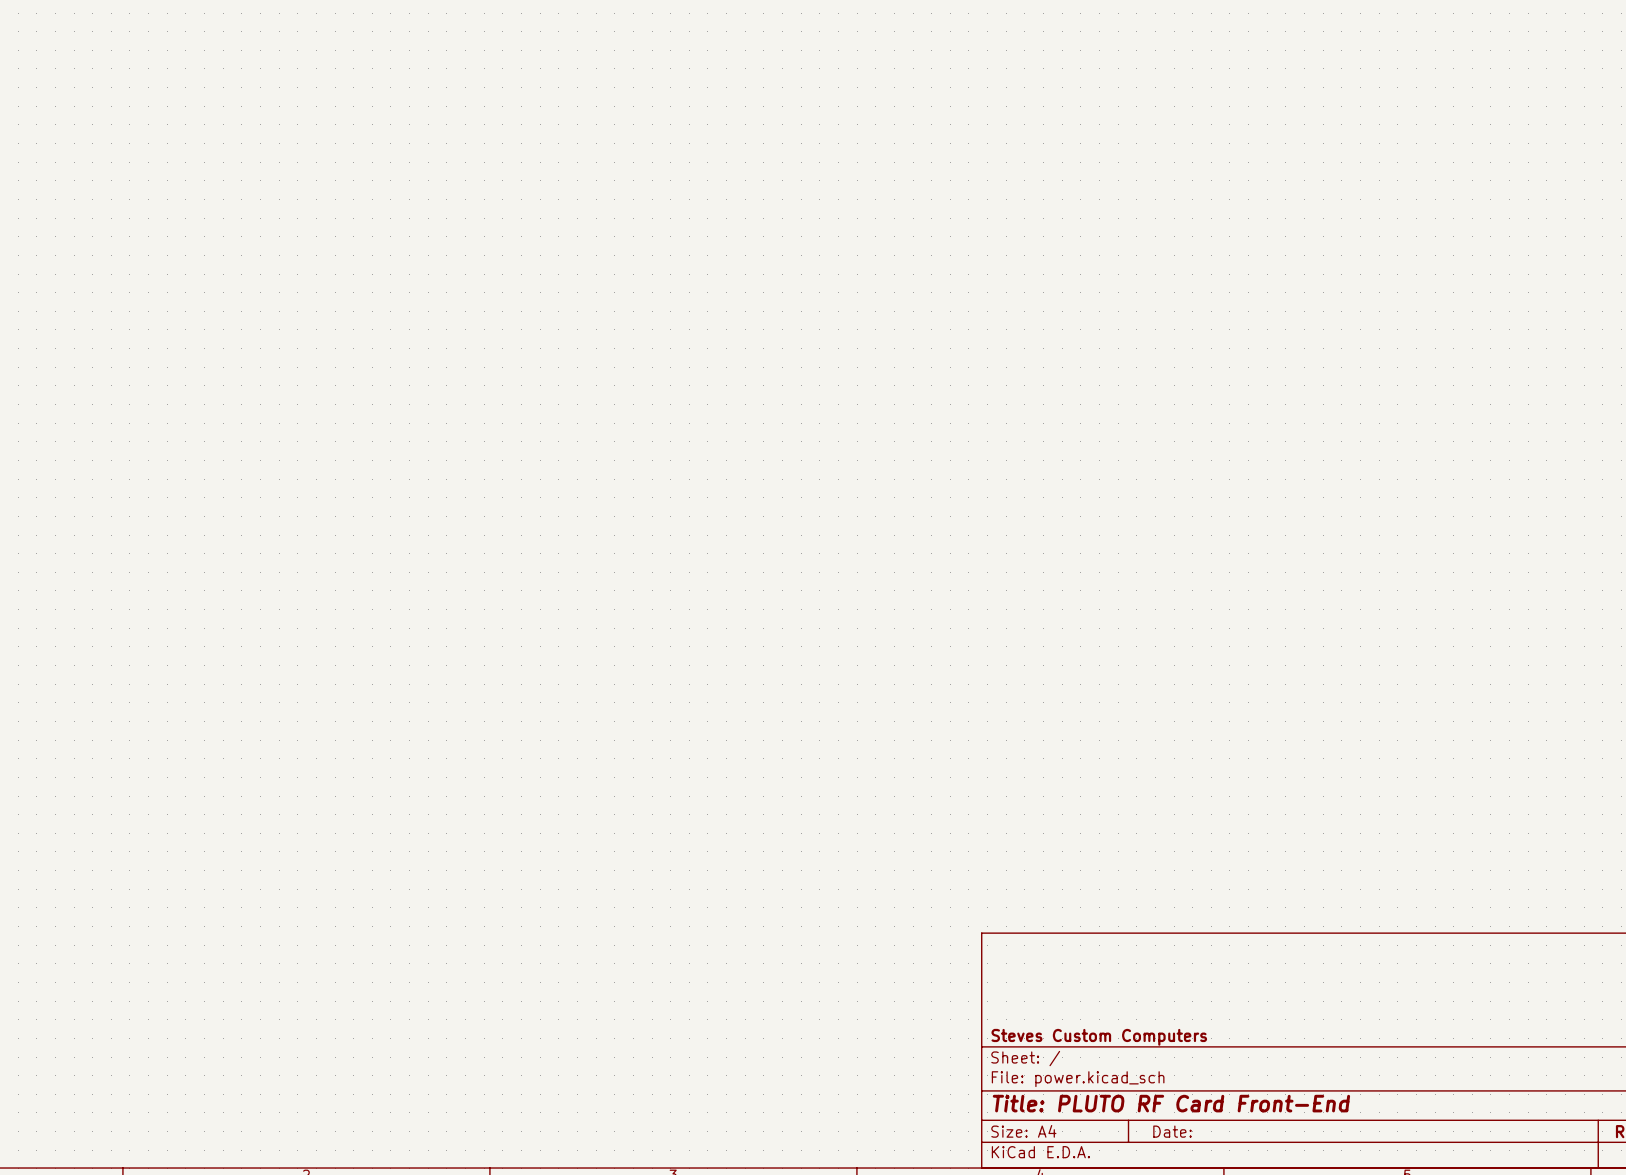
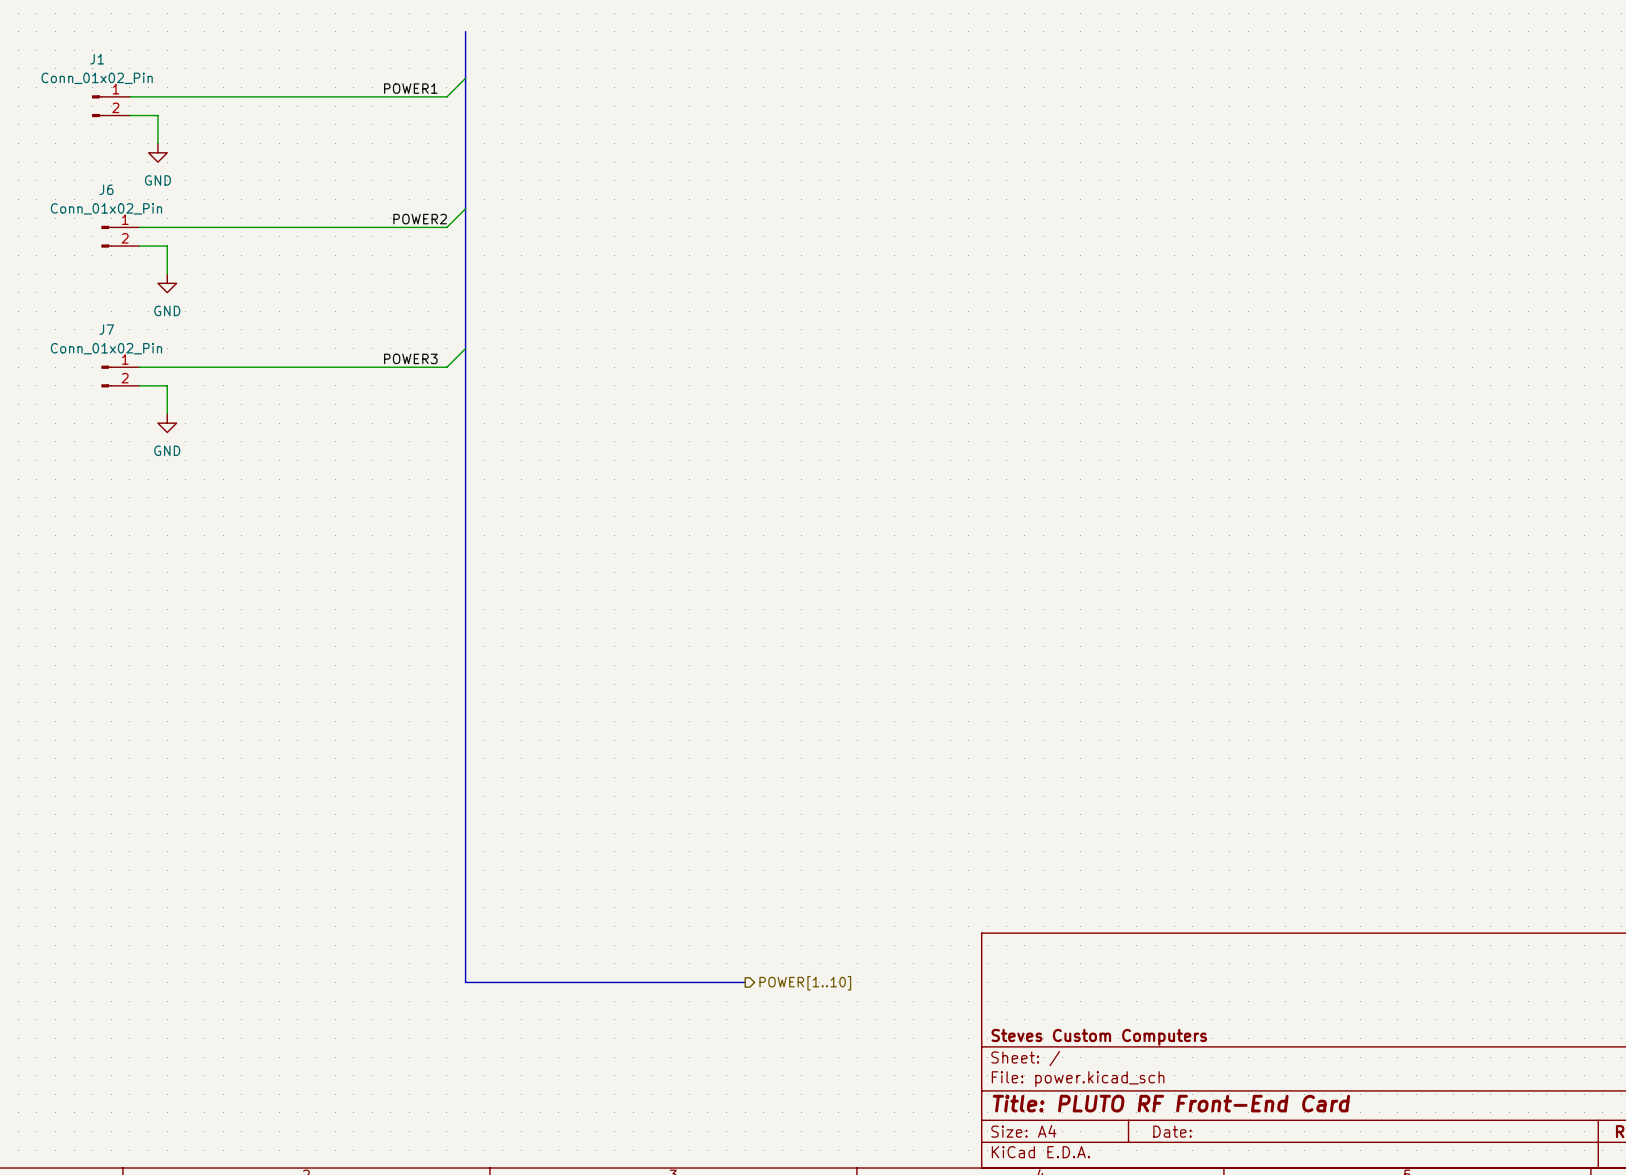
bus: none -> (465, 31) (465, 982) (745, 982)
wire: none -> (465, 78) (446, 96) (129, 96)
label: none -> POWER1 (410, 88)
J1: none -> Conn_01x02_Pin (111, 106)
wire: none -> (129, 115) (157, 115) (157, 143)
power symbol: none -> GND (157, 152)
wire: none -> (465, 208) (446, 227) (139, 227)
label: none -> POWER2 (420, 219)
J6: none -> Conn_01x02_Pin (120, 236)
wire: none -> (139, 246) (167, 246) (167, 274)
power symbol: none -> GND (167, 283)
wire: none -> (465, 348) (446, 367) (139, 367)
label: none -> POWER3 (410, 358)
J7: none -> Conn_01x02_Pin (120, 376)
wire: none -> (139, 385) (167, 385) (167, 413)
power symbol: none -> GND (167, 423)
hierarchical label: none -> POWER[1..10] (805, 983)
title block: Title: PLUTO RF Card Front-End (1171, 1103) -> Title: PLUTO RF Front-End Card (1171, 1103)

